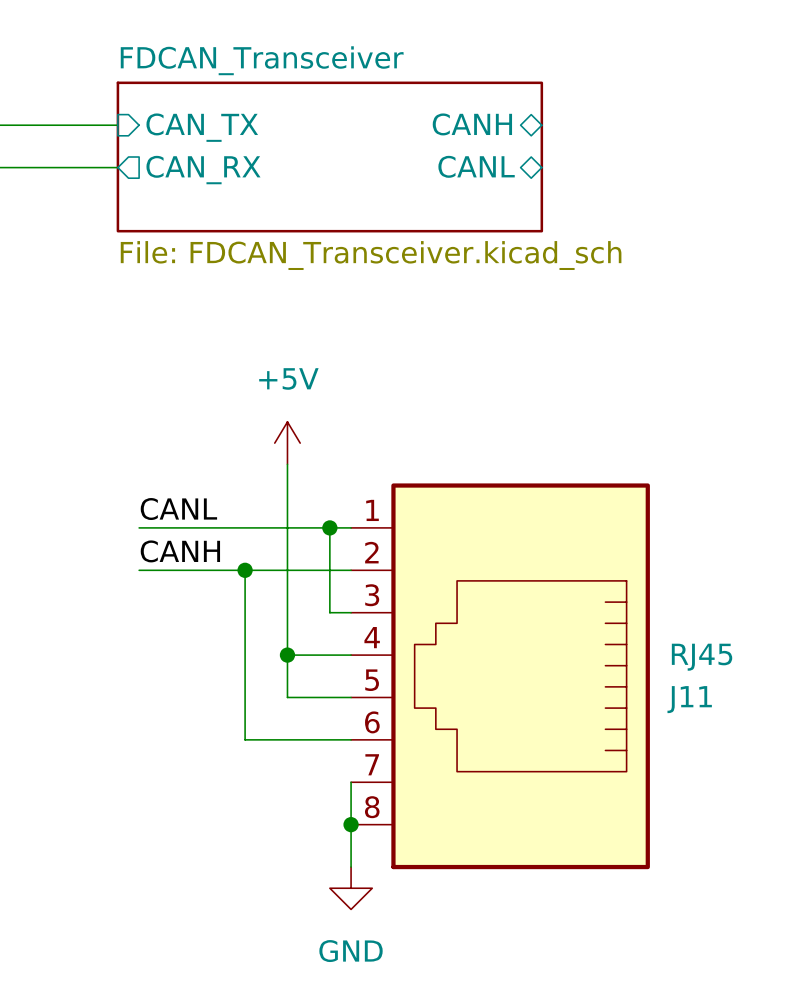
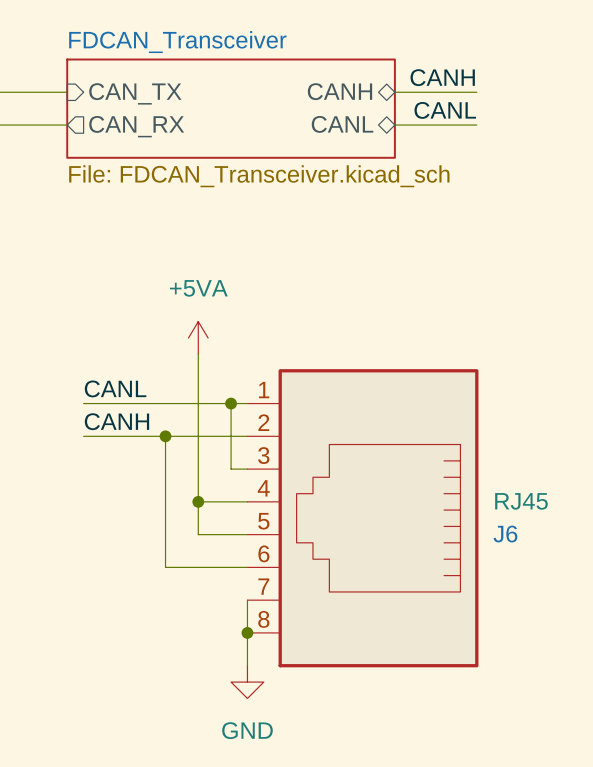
sheet FDCAN_Transceiver shape: [116, 81, 544, 233] -> [66, 58, 396, 159]
label: none -> CANH (442, 77)
wire: none -> (394, 92) (476, 92)
label: none -> CANL (445, 110)
wire: none -> (394, 125) (476, 125)
power symbol: +5V (287, 443) -> +5VA (198, 338)
J11 name: J11 (689, 699) -> J6 (505, 534)

